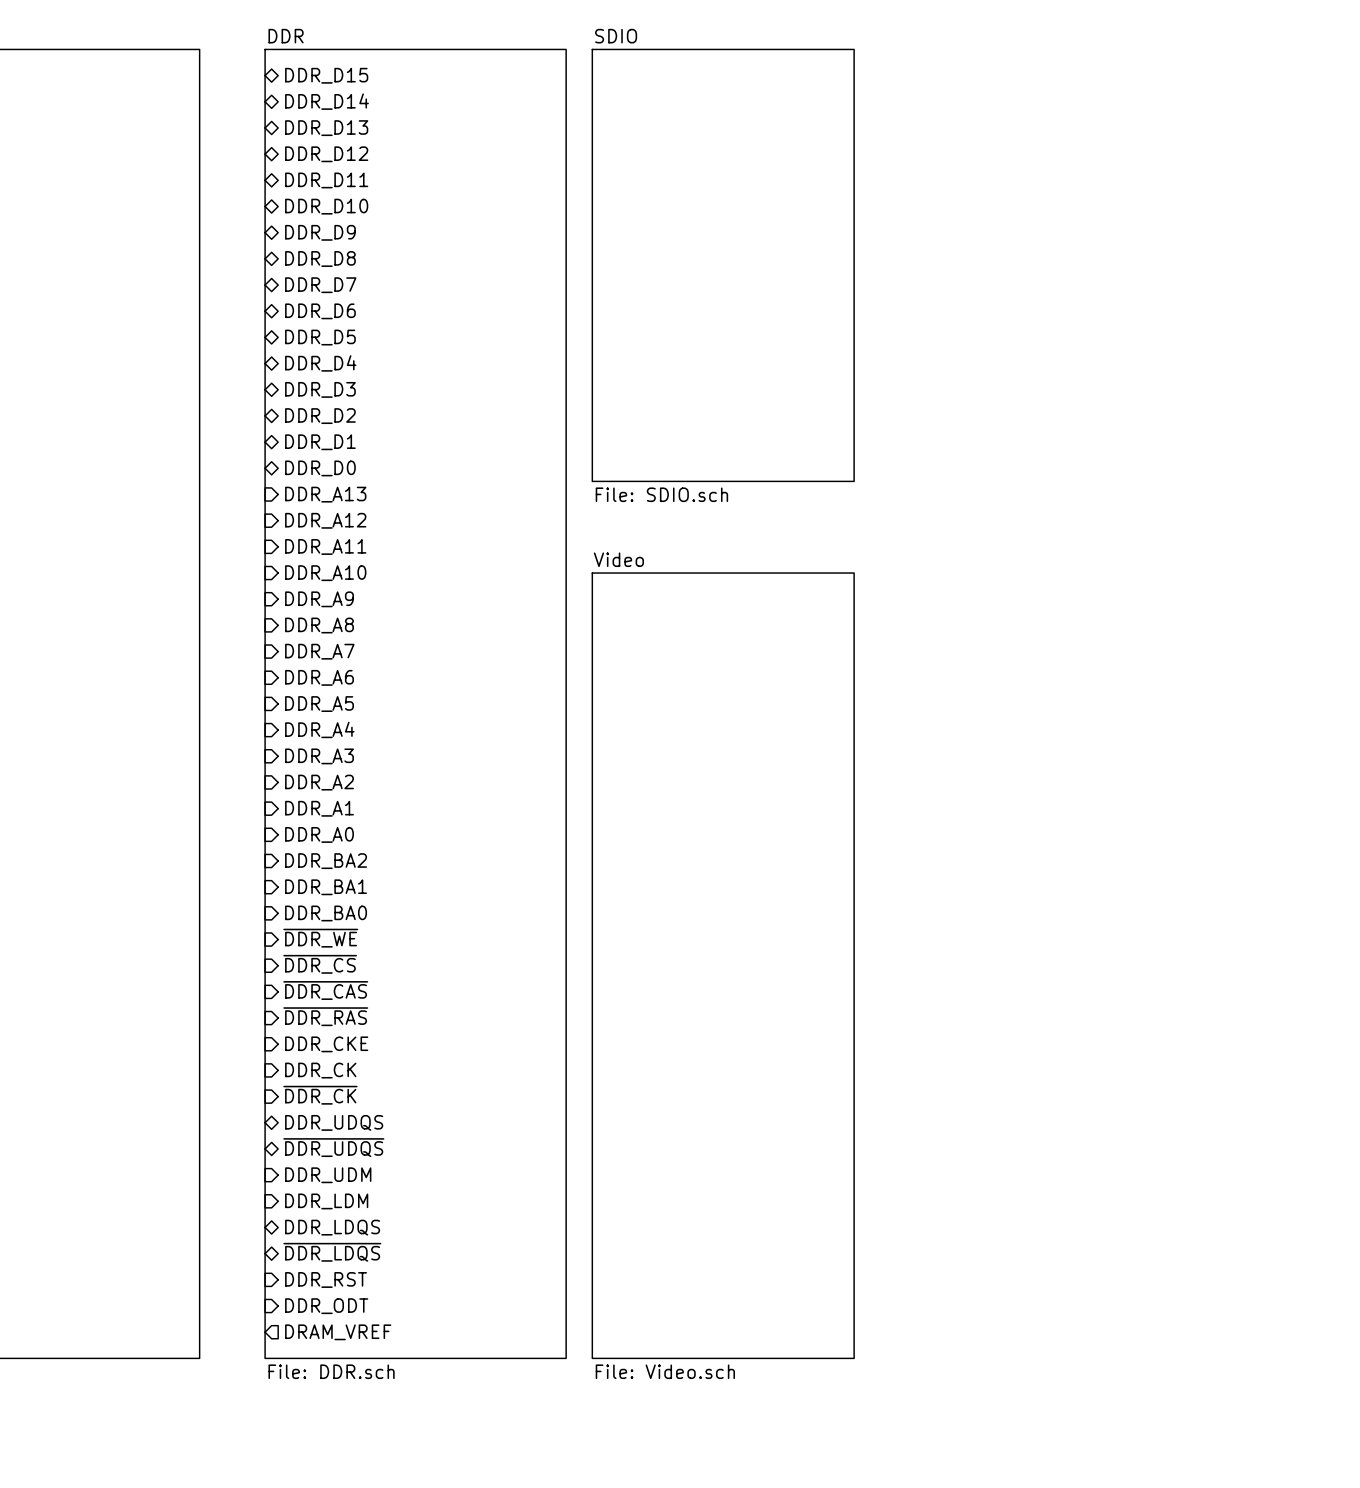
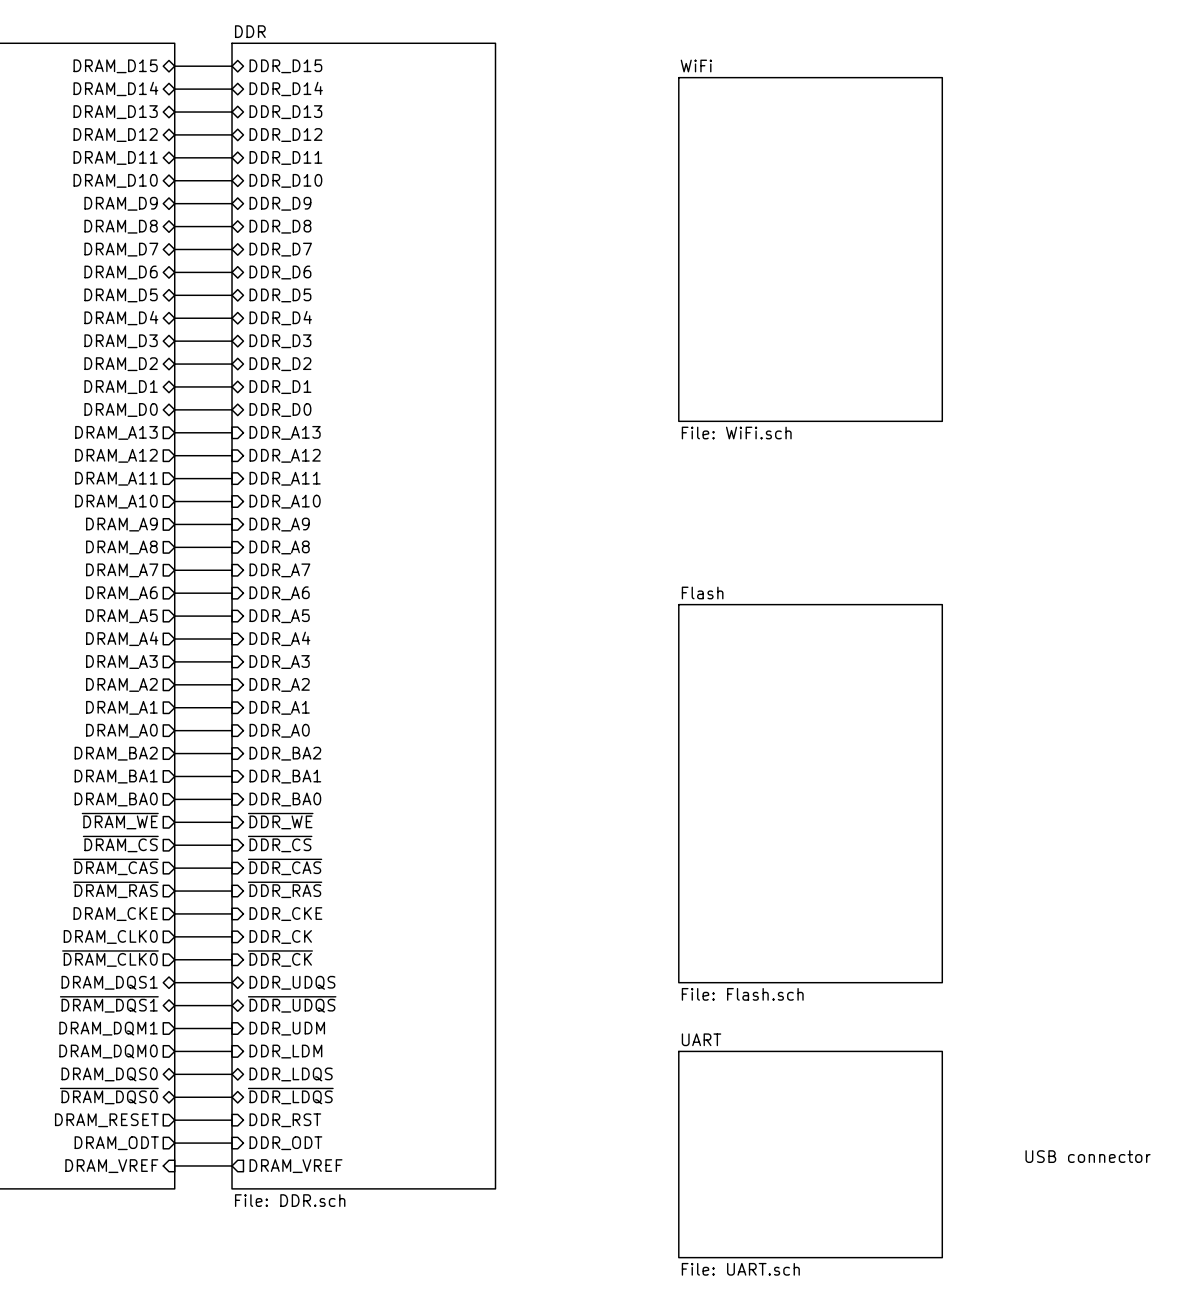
sheet pin: none -> DRAM_D15 (115, 66)
wire: none -> (174, 66) (232, 66)
sheet pin: none -> DRAM_D14 (115, 88)
wire: none -> (174, 89) (232, 89)
wire: none -> (174, 112) (232, 112)
sheet pin: none -> DRAM_D13 (115, 112)
sheet pin: none -> DRAM_D12 (115, 135)
wire: none -> (174, 134) (232, 134)
sheet pin: none -> DRAM_D11 (115, 157)
wire: none -> (174, 157) (232, 157)
sheet pin: none -> DRAM_D10 (115, 180)
wire: none -> (174, 180) (232, 180)
sheet pin: none -> DRAM_D9 (121, 203)
wire: none -> (174, 203) (232, 203)
wire: none -> (174, 226) (232, 226)
sheet pin: none -> DRAM_D8 (121, 226)
sheet SDIO: File: SDIO.sch (723, 265) -> none
sheet pin: none -> DRAM_D7 (121, 249)
wire: none -> (174, 249) (232, 249)
sheet WiFi: none -> File: WiFi.sch (810, 249)
sheet pin: none -> DRAM_D6 (121, 272)
wire: none -> (174, 272) (232, 272)
sheet pin: none -> DRAM_D5 (121, 295)
wire: none -> (174, 295) (232, 295)
sheet pin: none -> DRAM_D4 (121, 318)
wire: none -> (174, 318) (232, 318)
sheet pin: none -> DRAM_D3 (121, 341)
wire: none -> (174, 341) (232, 341)
wire: none -> (174, 364) (232, 364)
sheet pin: none -> DRAM_D2 (121, 364)
sheet pin: none -> DRAM_D1 (121, 387)
wire: none -> (174, 386) (232, 386)
sheet pin: none -> DRAM_D0 (121, 409)
wire: none -> (174, 409) (232, 409)
sheet pin: none -> DRAM_A13 (116, 432)
wire: none -> (174, 432) (232, 432)
sheet pin: none -> DRAM_A12 (116, 455)
wire: none -> (174, 455) (232, 455)
sheet pin: none -> DRAM_A11 (116, 478)
wire: none -> (174, 478) (232, 478)
sheet pin: none -> DRAM_A10 (116, 501)
wire: none -> (174, 501) (232, 501)
sheet pin: none -> DRAM_A9 (121, 524)
wire: none -> (174, 524) (232, 524)
sheet pin: none -> DRAM_A8 (121, 547)
wire: none -> (174, 547) (232, 547)
sheet pin: none -> DRAM_A7 (122, 570)
wire: none -> (174, 570) (232, 570)
sheet pin: none -> DRAM_A6 (121, 593)
wire: none -> (174, 593) (232, 593)
wire: none -> (174, 616) (232, 616)
sheet pin: none -> DRAM_A5 (121, 616)
sheet pin: none -> DRAM_A4 (122, 638)
wire: none -> (174, 639) (232, 639)
sheet pin: none -> DRAM_A3 (121, 662)
wire: none -> (174, 661) (232, 661)
sheet pin: none -> DRAM_A2 (121, 684)
wire: none -> (174, 684) (232, 684)
sheet pin: none -> DRAM_A1 (121, 707)
wire: none -> (174, 707) (232, 707)
sheet pin: none -> DRAM_A0 (121, 730)
wire: none -> (174, 730) (232, 730)
wire: none -> (174, 753) (232, 753)
sheet pin: none -> DRAM_BA2 (116, 753)
sheet pin: none -> DRAM_BA1 (116, 776)
wire: none -> (174, 776) (232, 776)
sheet Flash: none -> File: Flash.sch (810, 793)
sheet pin: none -> DRAM_BA0 (116, 799)
wire: none -> (174, 799) (232, 799)
sheet pin: none -> ~{DRAM_WE} (120, 821)
wire: none -> (174, 822) (232, 822)
sheet pin: none -> ~{DRAM_CS} (120, 844)
wire: none -> (174, 845) (232, 845)
sheet Video: File: Video.sch (723, 965) -> none
sheet pin: none -> ~{DRAM_CAS} (115, 866)
wire: none -> (174, 868) (232, 868)
sheet pin: none -> ~{DRAM_RAS} (115, 889)
wire: none -> (174, 891) (232, 891)
sheet pin: none -> DRAM_CKE (115, 914)
wire: none -> (174, 913) (232, 913)
sheet pin: none -> DRAM_CLK0 (110, 936)
wire: none -> (174, 936) (232, 936)
sheet pin: none -> ~{DRAM_CLK0} (110, 958)
wire: none -> (174, 959) (232, 959)
sheet pin: none -> DRAM_DQS1 (109, 982)
wire: none -> (174, 982) (232, 982)
sheet pin: none -> ~{DRAM_DQS1} (109, 1004)
wire: none -> (174, 1005) (232, 1005)
sheet pin: none -> DRAM_DQM1 (108, 1028)
wire: none -> (174, 1028) (232, 1028)
sheet pin: none -> DRAM_DQM0 (108, 1051)
wire: none -> (174, 1051) (232, 1051)
sheet pin: none -> DRAM_DQS0 (109, 1074)
wire: none -> (174, 1074) (232, 1074)
sheet pin: none -> ~{DRAM_DQS0} (109, 1096)
wire: none -> (174, 1097) (232, 1097)
sheet pin: none -> DRAM_RESET (106, 1120)
wire: none -> (174, 1120) (232, 1120)
sheet pin: none -> DRAM_ODT (116, 1143)
wire: none -> (174, 1143) (232, 1143)
sheet UART: none -> File: UART.sch (810, 1154)
text: none -> USB connector (1088, 1156)
sheet pin: none -> DRAM_VREF (111, 1166)
wire: none -> (174, 1165) (232, 1165)

